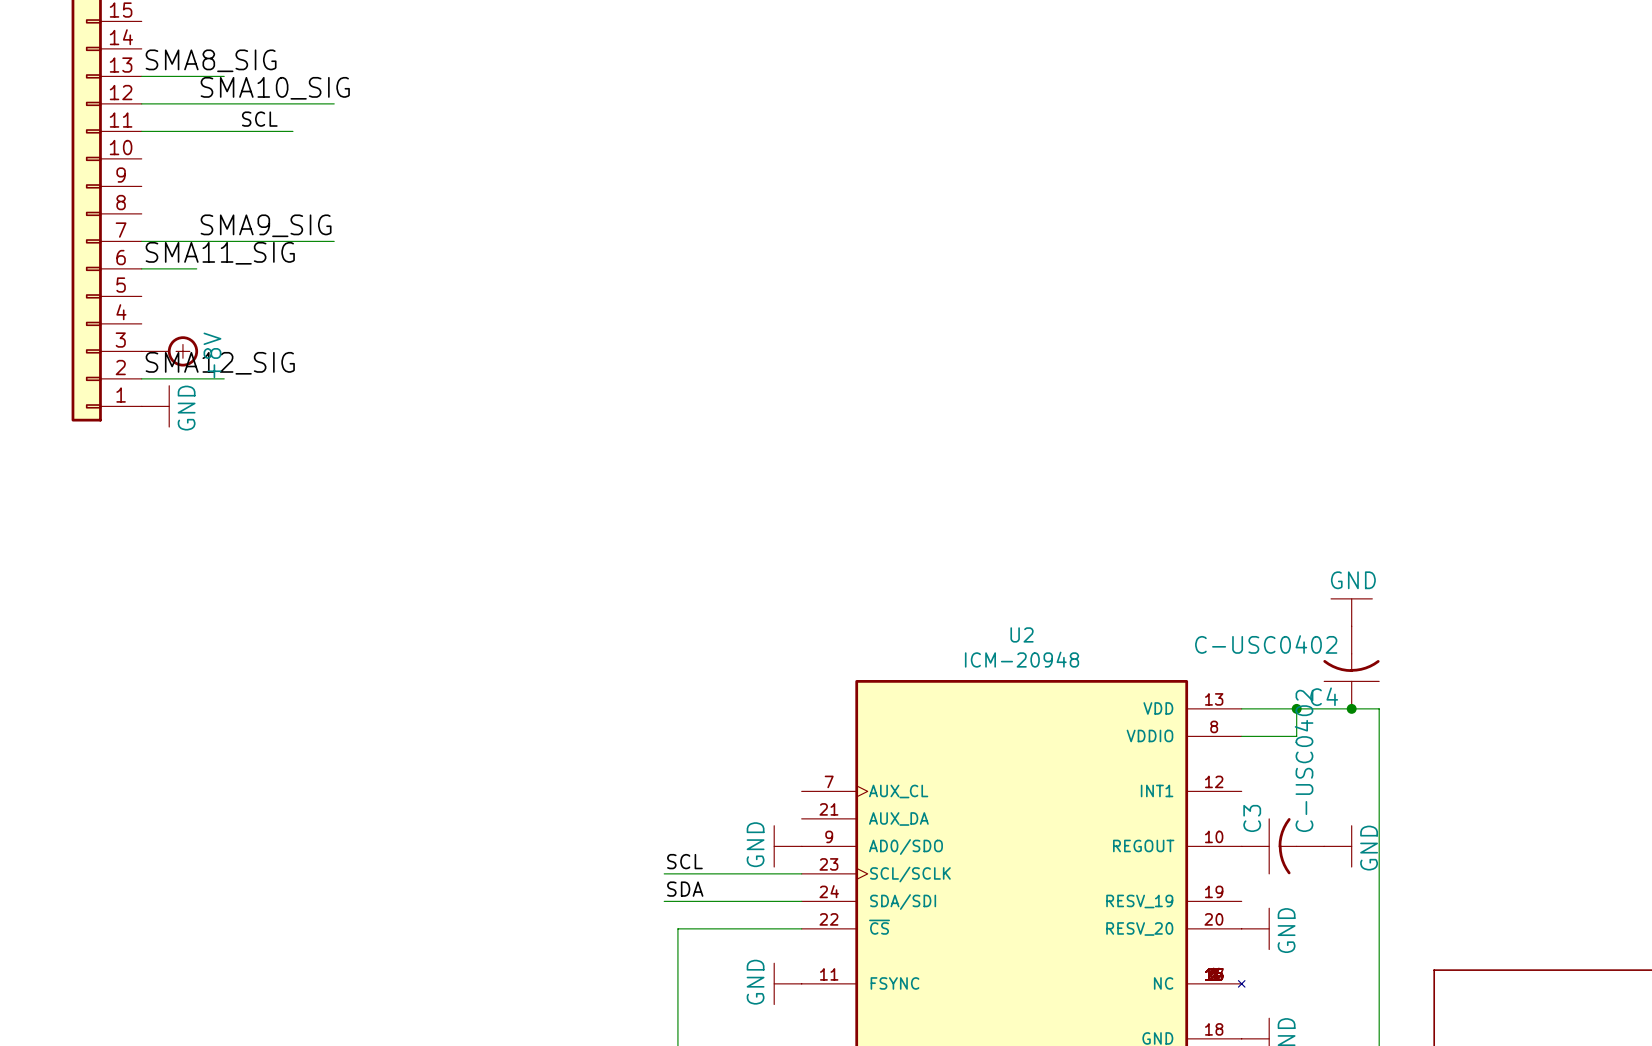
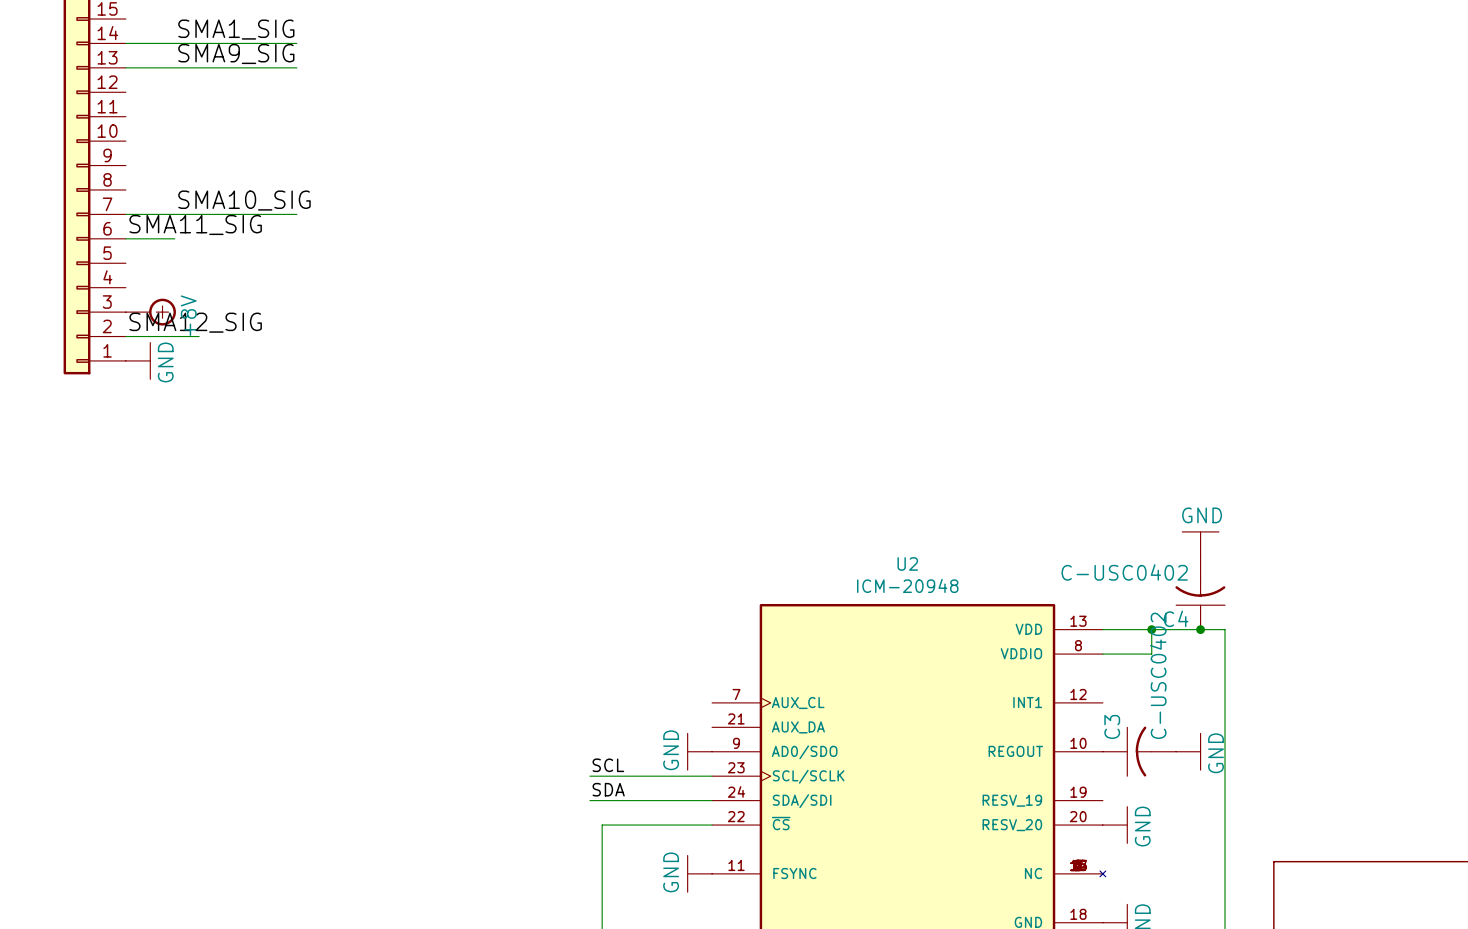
label: none -> SMA1_SIG (236, 29)
label: SMA8_SIG (211, 60) -> none
label: none -> SMA9_SIG (236, 53)
wire: none -> (199, 67) (296, 67)
label: SMA10_SIG (275, 88) -> none
wire: (141, 103) (334, 103) -> (125, 43) (296, 43)
label: SCL (259, 119) -> none
wire: (141, 131) (292, 131) -> none
label: SMA9_SIG (266, 225) -> SMA10_SIG (244, 200)

